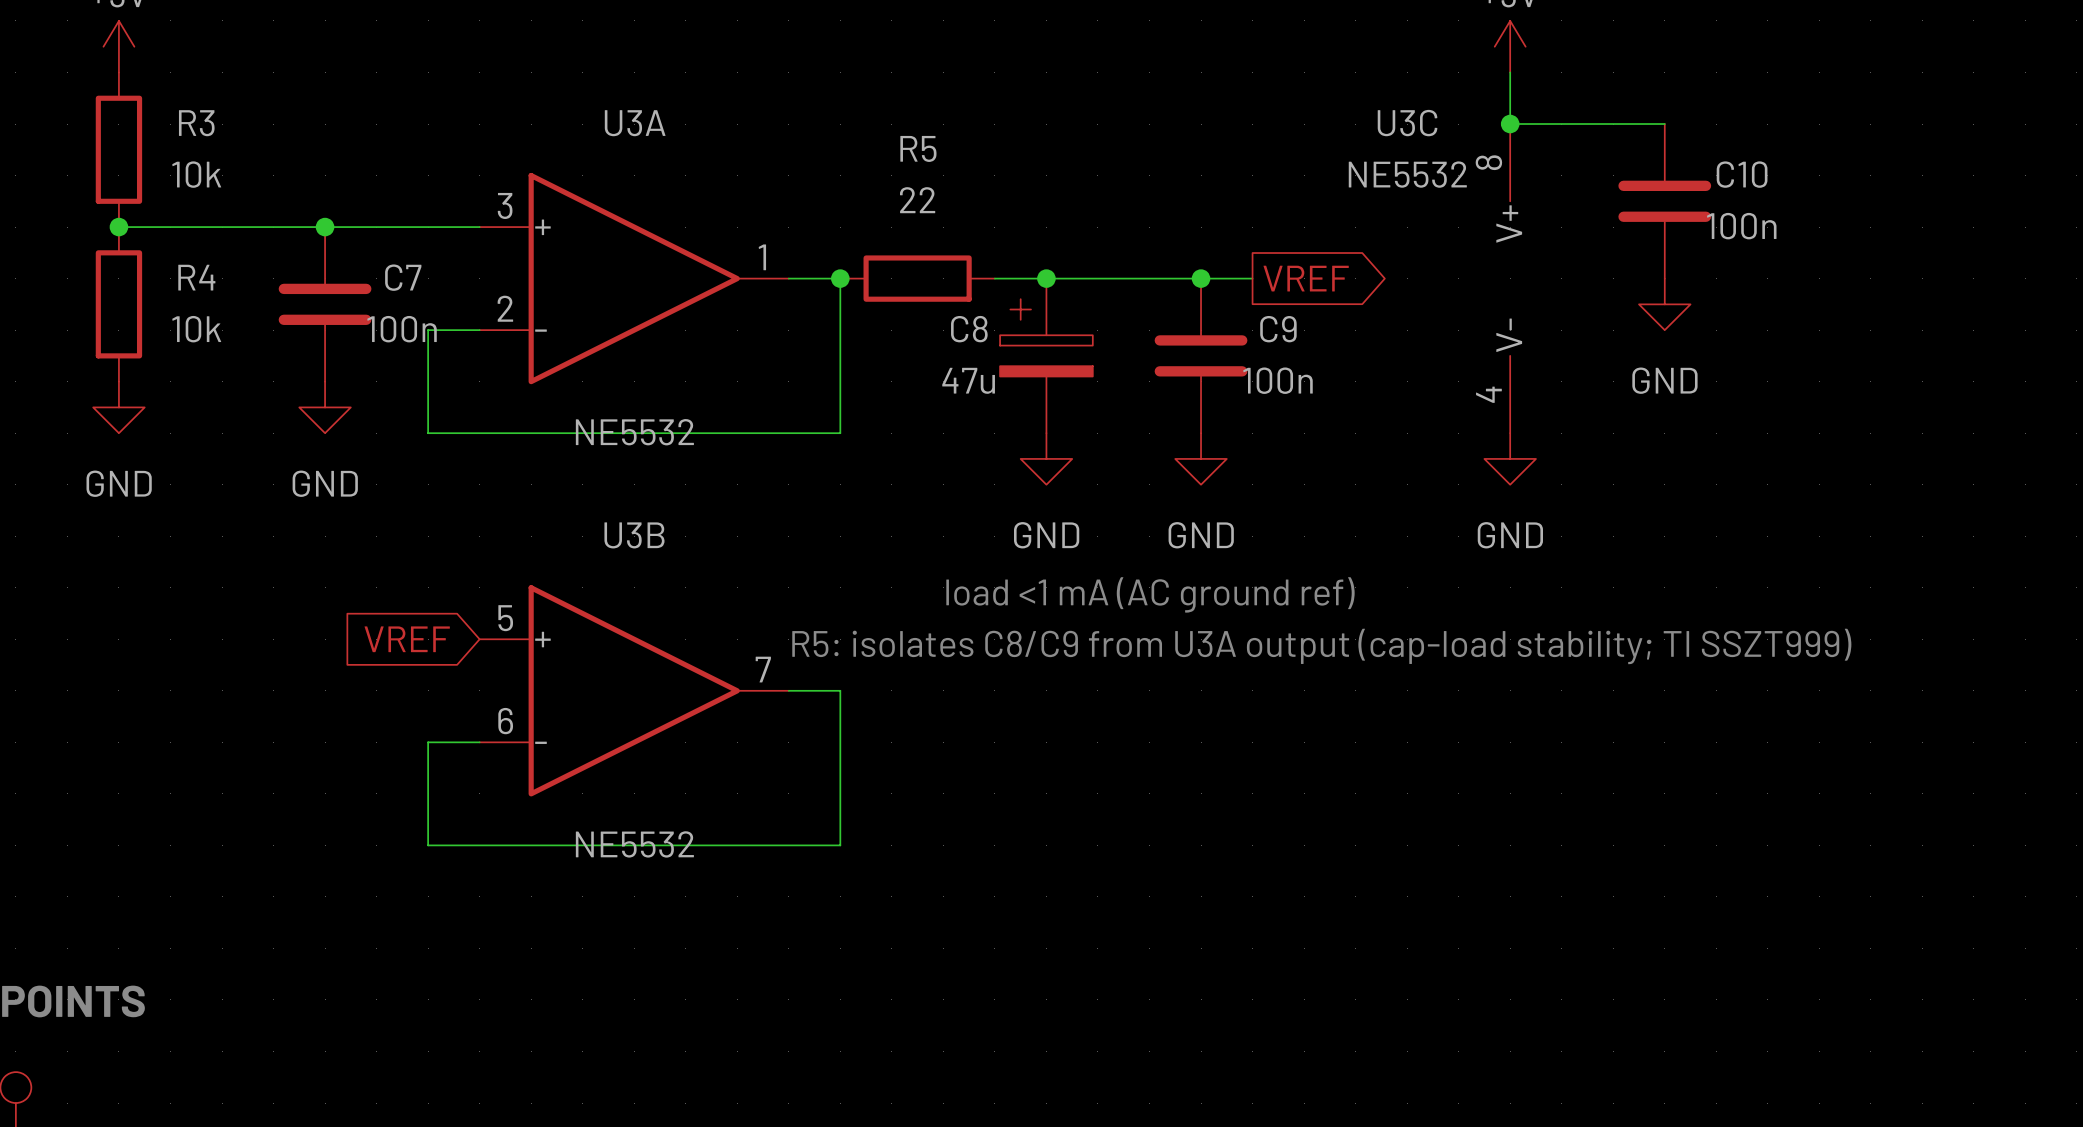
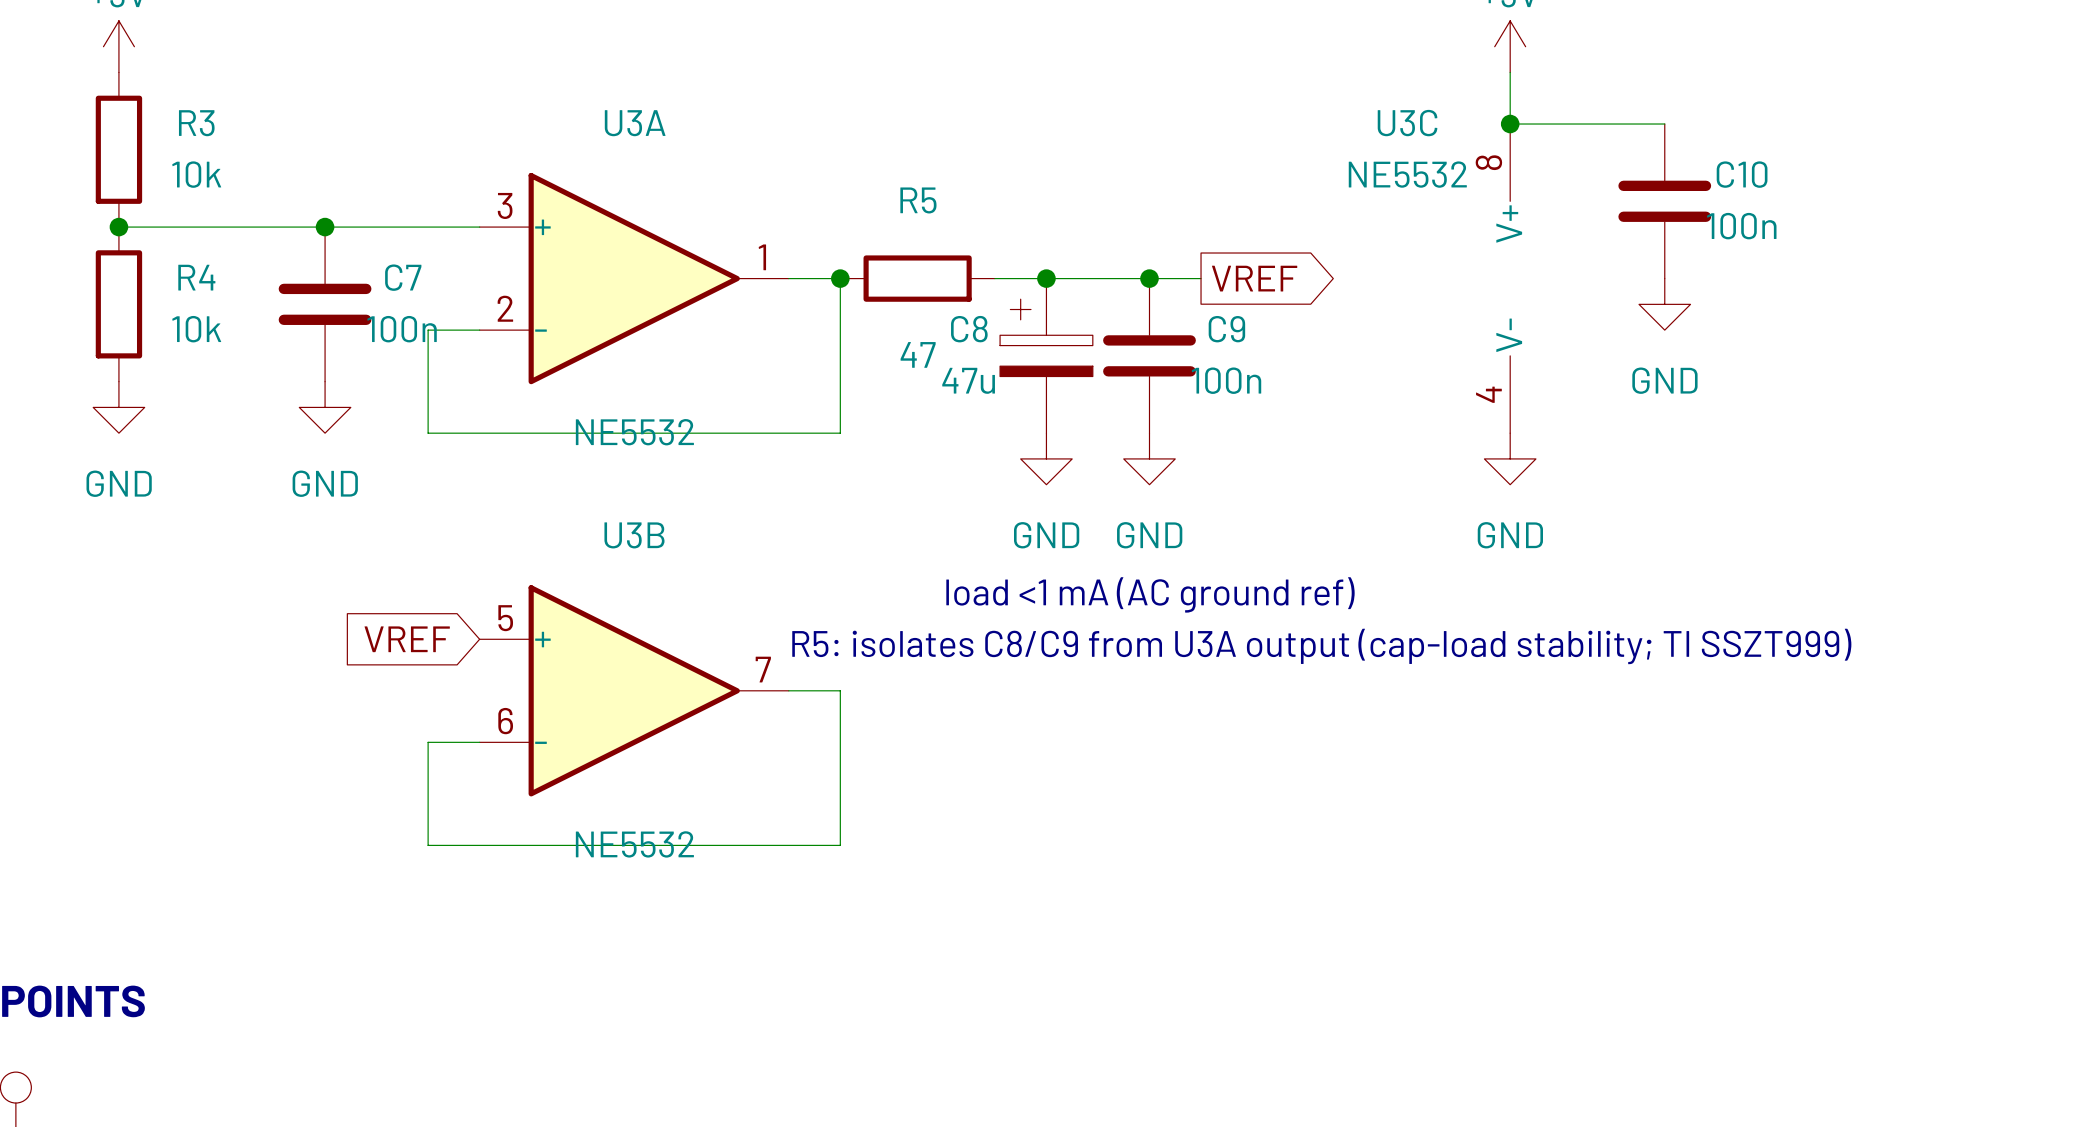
R5 name position: R5 (918, 148) -> R5 (918, 200)
R5 value: 22 (917, 200) -> 47 (918, 354)
wire: (1201, 278) (1252, 278) -> none
junction position: (1201, 278) -> (1149, 278)
global label position: VREF (1306, 278) -> VREF (1254, 278)
C9 position: (1201, 355) -> (1149, 355)
power symbol position: GND (1201, 458) -> GND (1149, 458)

